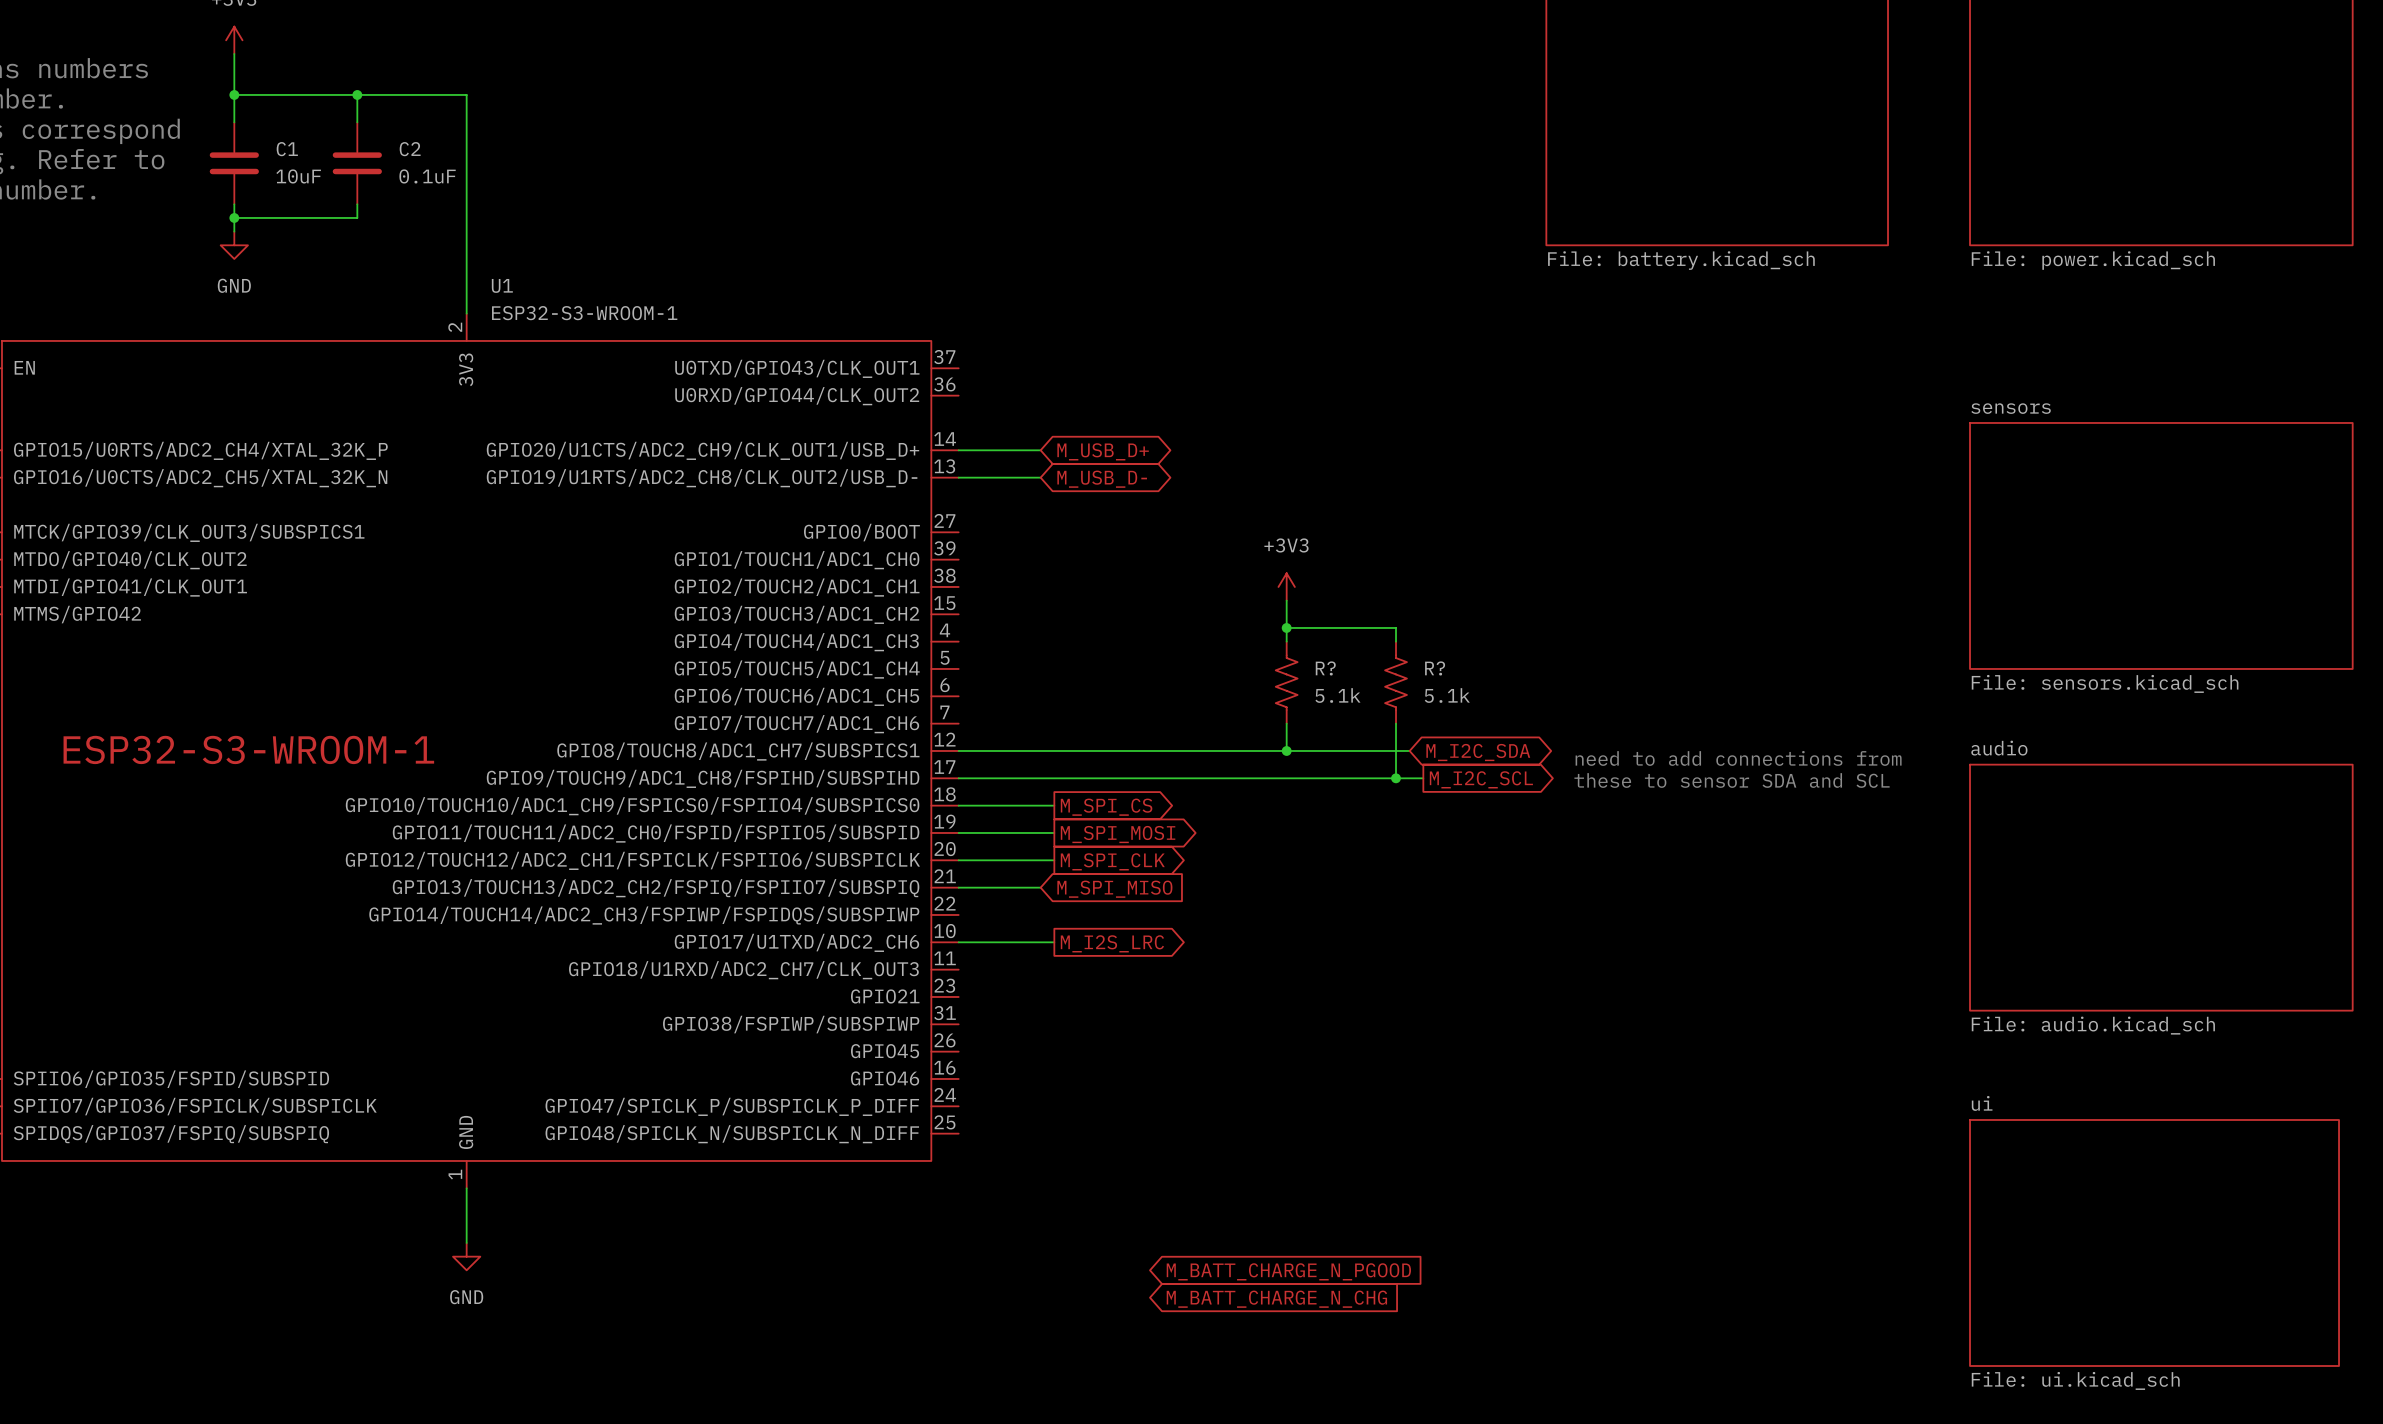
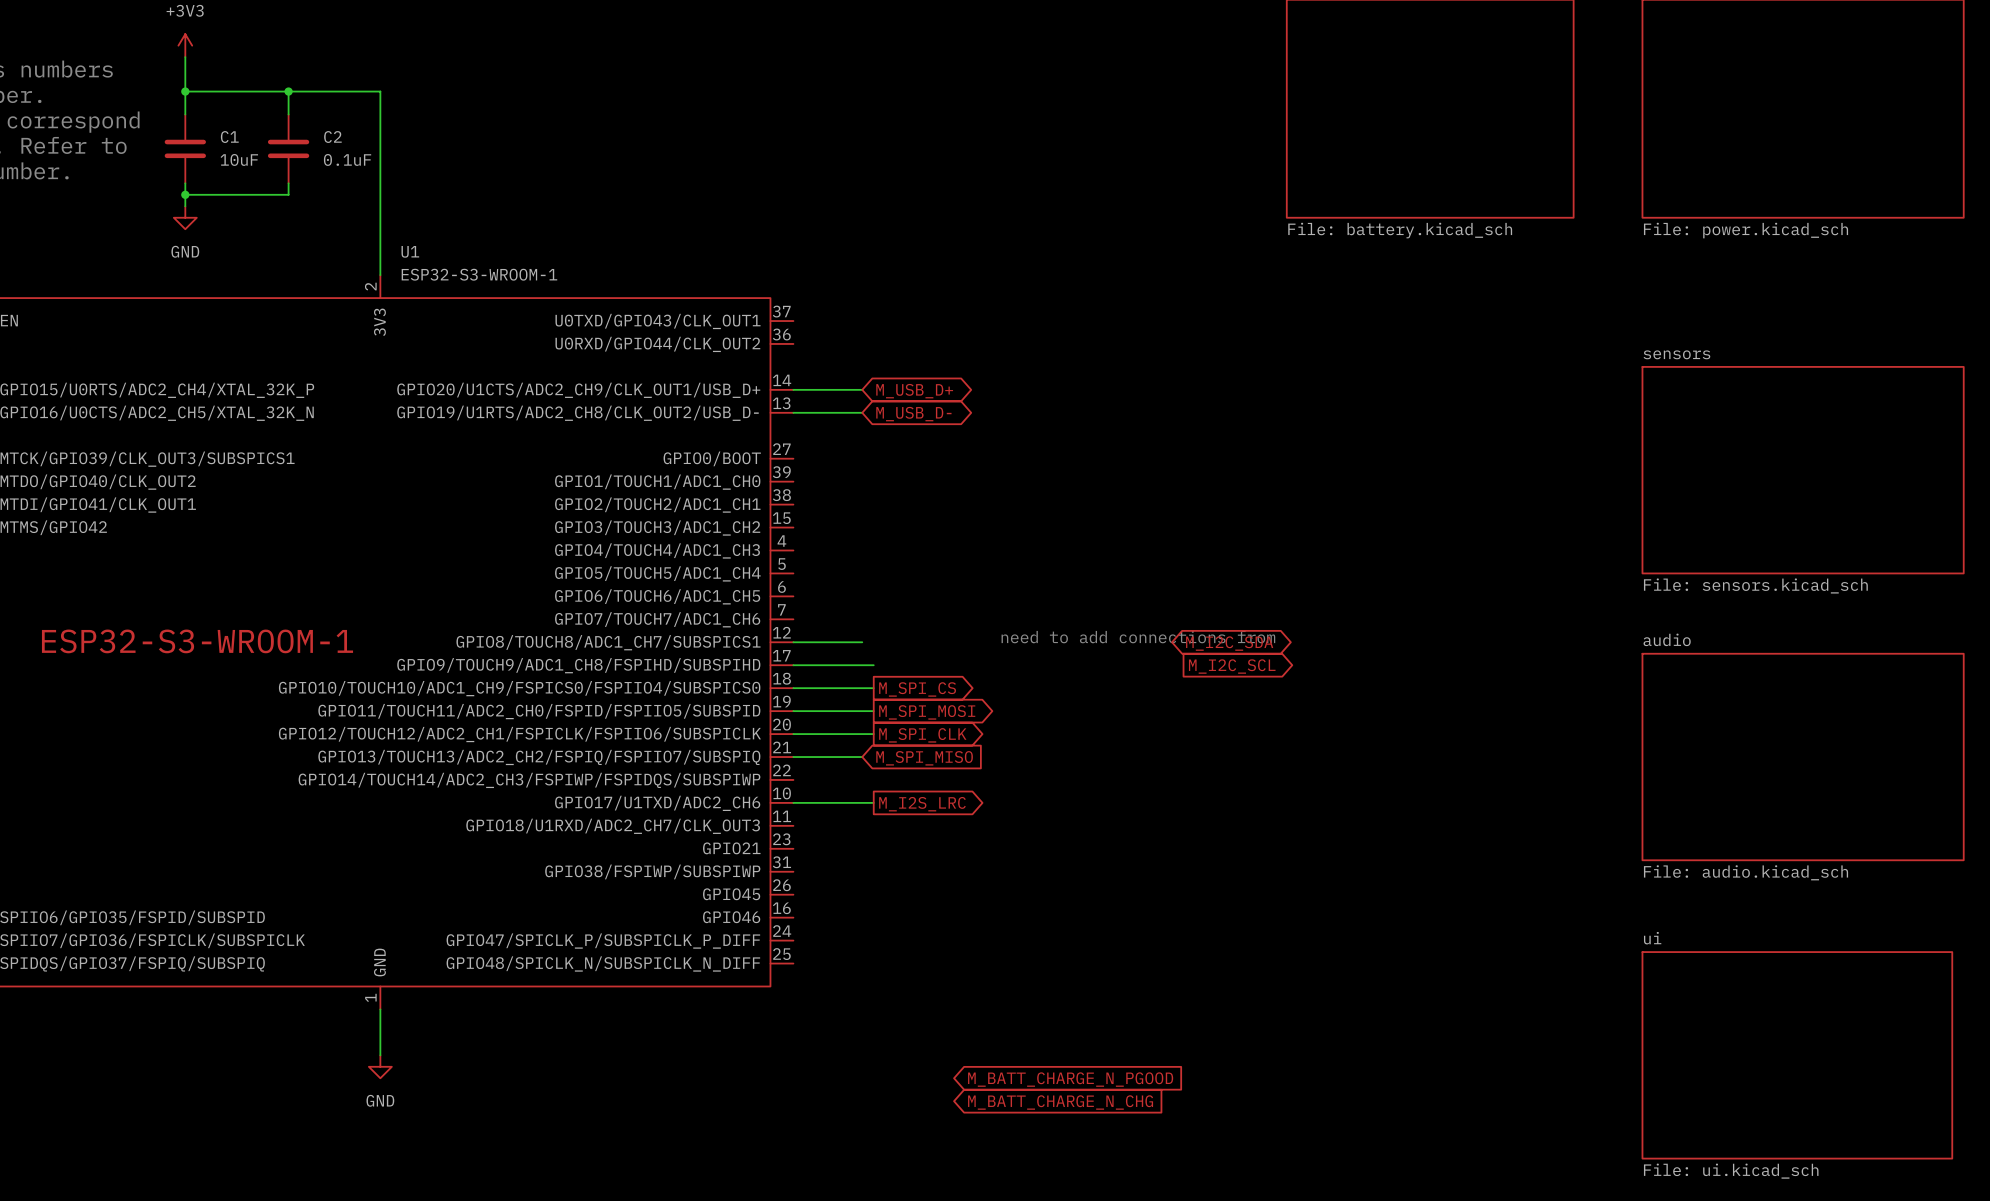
power symbol: +3V3 (1286, 586) -> none
wire: (1286, 600) (1286, 641) -> none
wire: (1286, 627) (1396, 627) (1396, 641) -> none
junction: (1286, 627) -> none
R?: 5.1k (1286, 682) -> none
R?: 5.1k (1396, 682) -> none
wire: (1286, 723) (1286, 750) -> none
wire: (1396, 723) (1396, 778) -> none
text: none -> need to add connections from (1138, 637)
wire: (1040, 750) (1409, 750) -> none
junction: (1286, 750) -> none
text: need to add connections from (1738, 758) -> none
wire: (1054, 778) (1423, 778) -> none
junction: (1396, 778) -> none
text: these to sensor SDA and SCL (1732, 780) -> none

